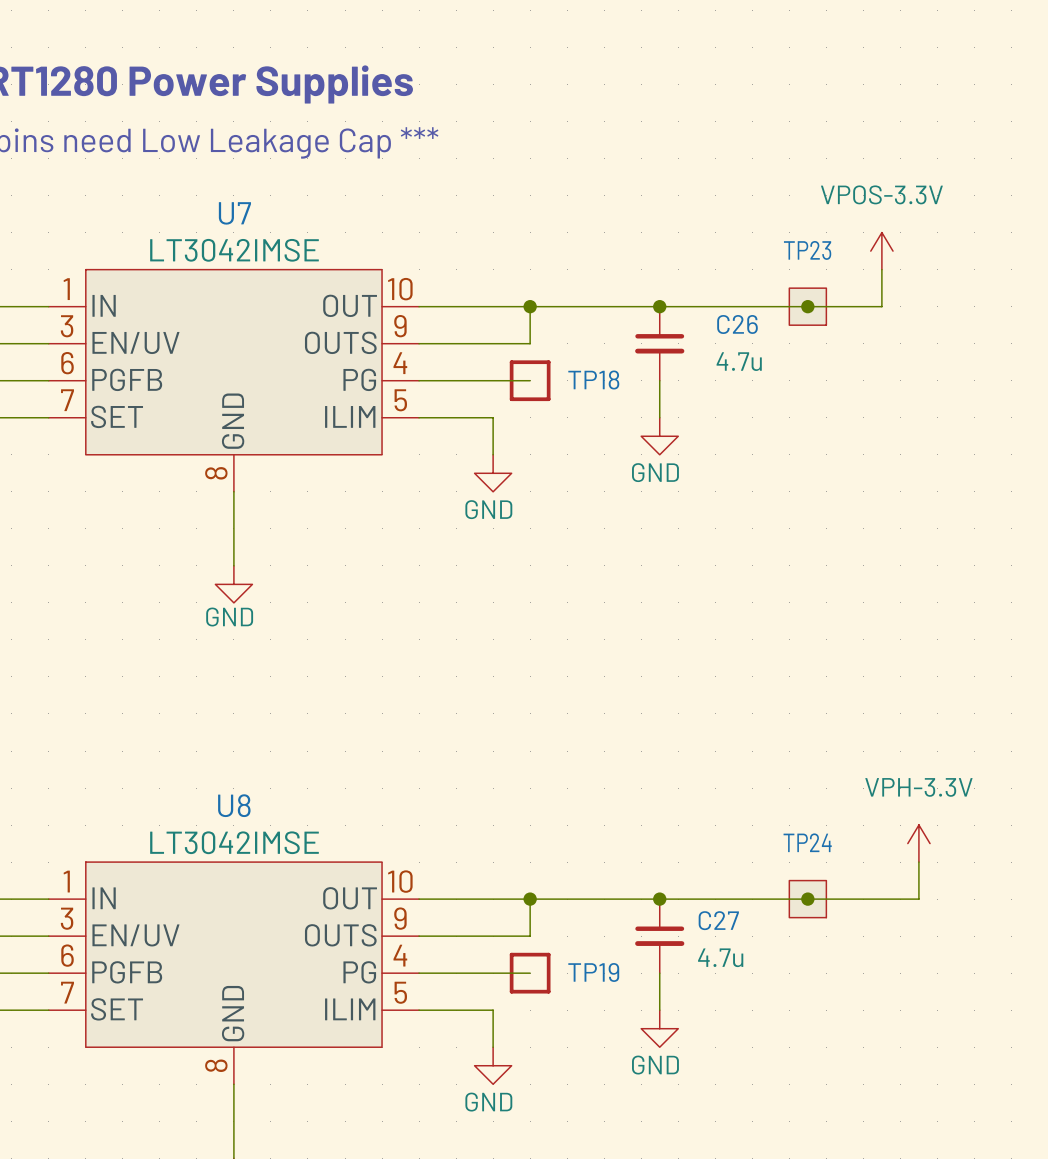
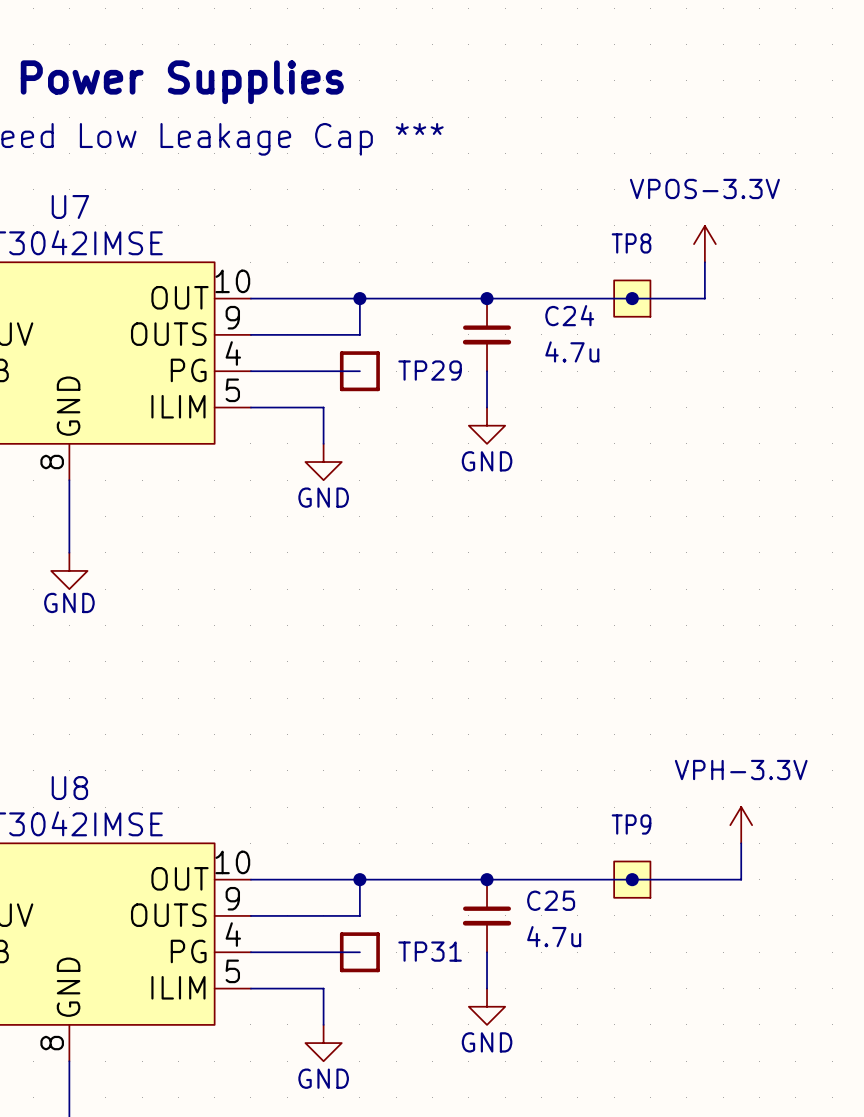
TP23 name: TP23 (807, 250) -> TP8 (631, 243)
C26 name: C26 (737, 324) -> C24 (569, 315)
TP18 name: TP18 (593, 380) -> TP29 (430, 370)
TP24 name: TP24 (807, 842) -> TP9 (631, 824)
C27 name: C27 (718, 920) -> C25 (551, 900)
TP19 name: TP19 (593, 972) -> TP31 (430, 951)

